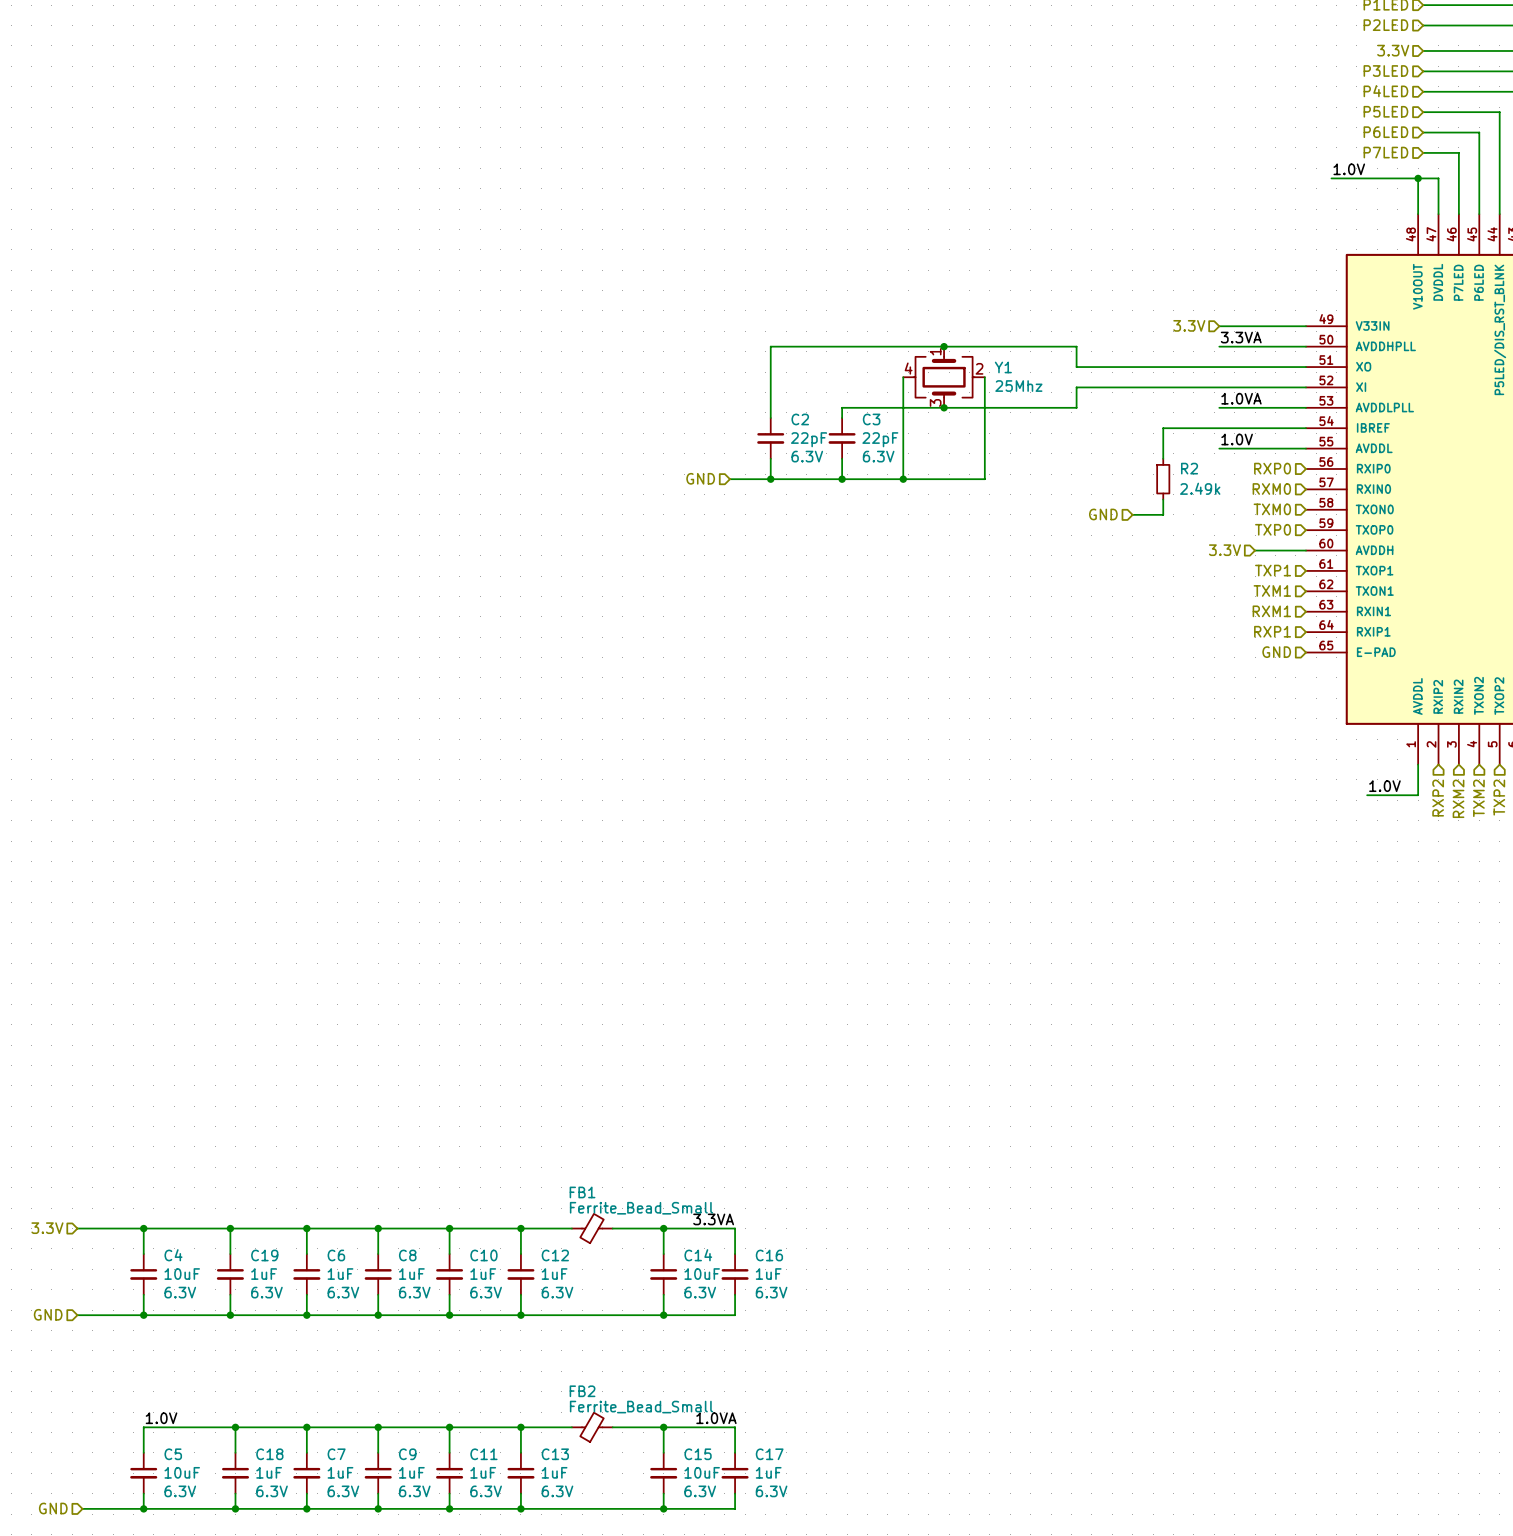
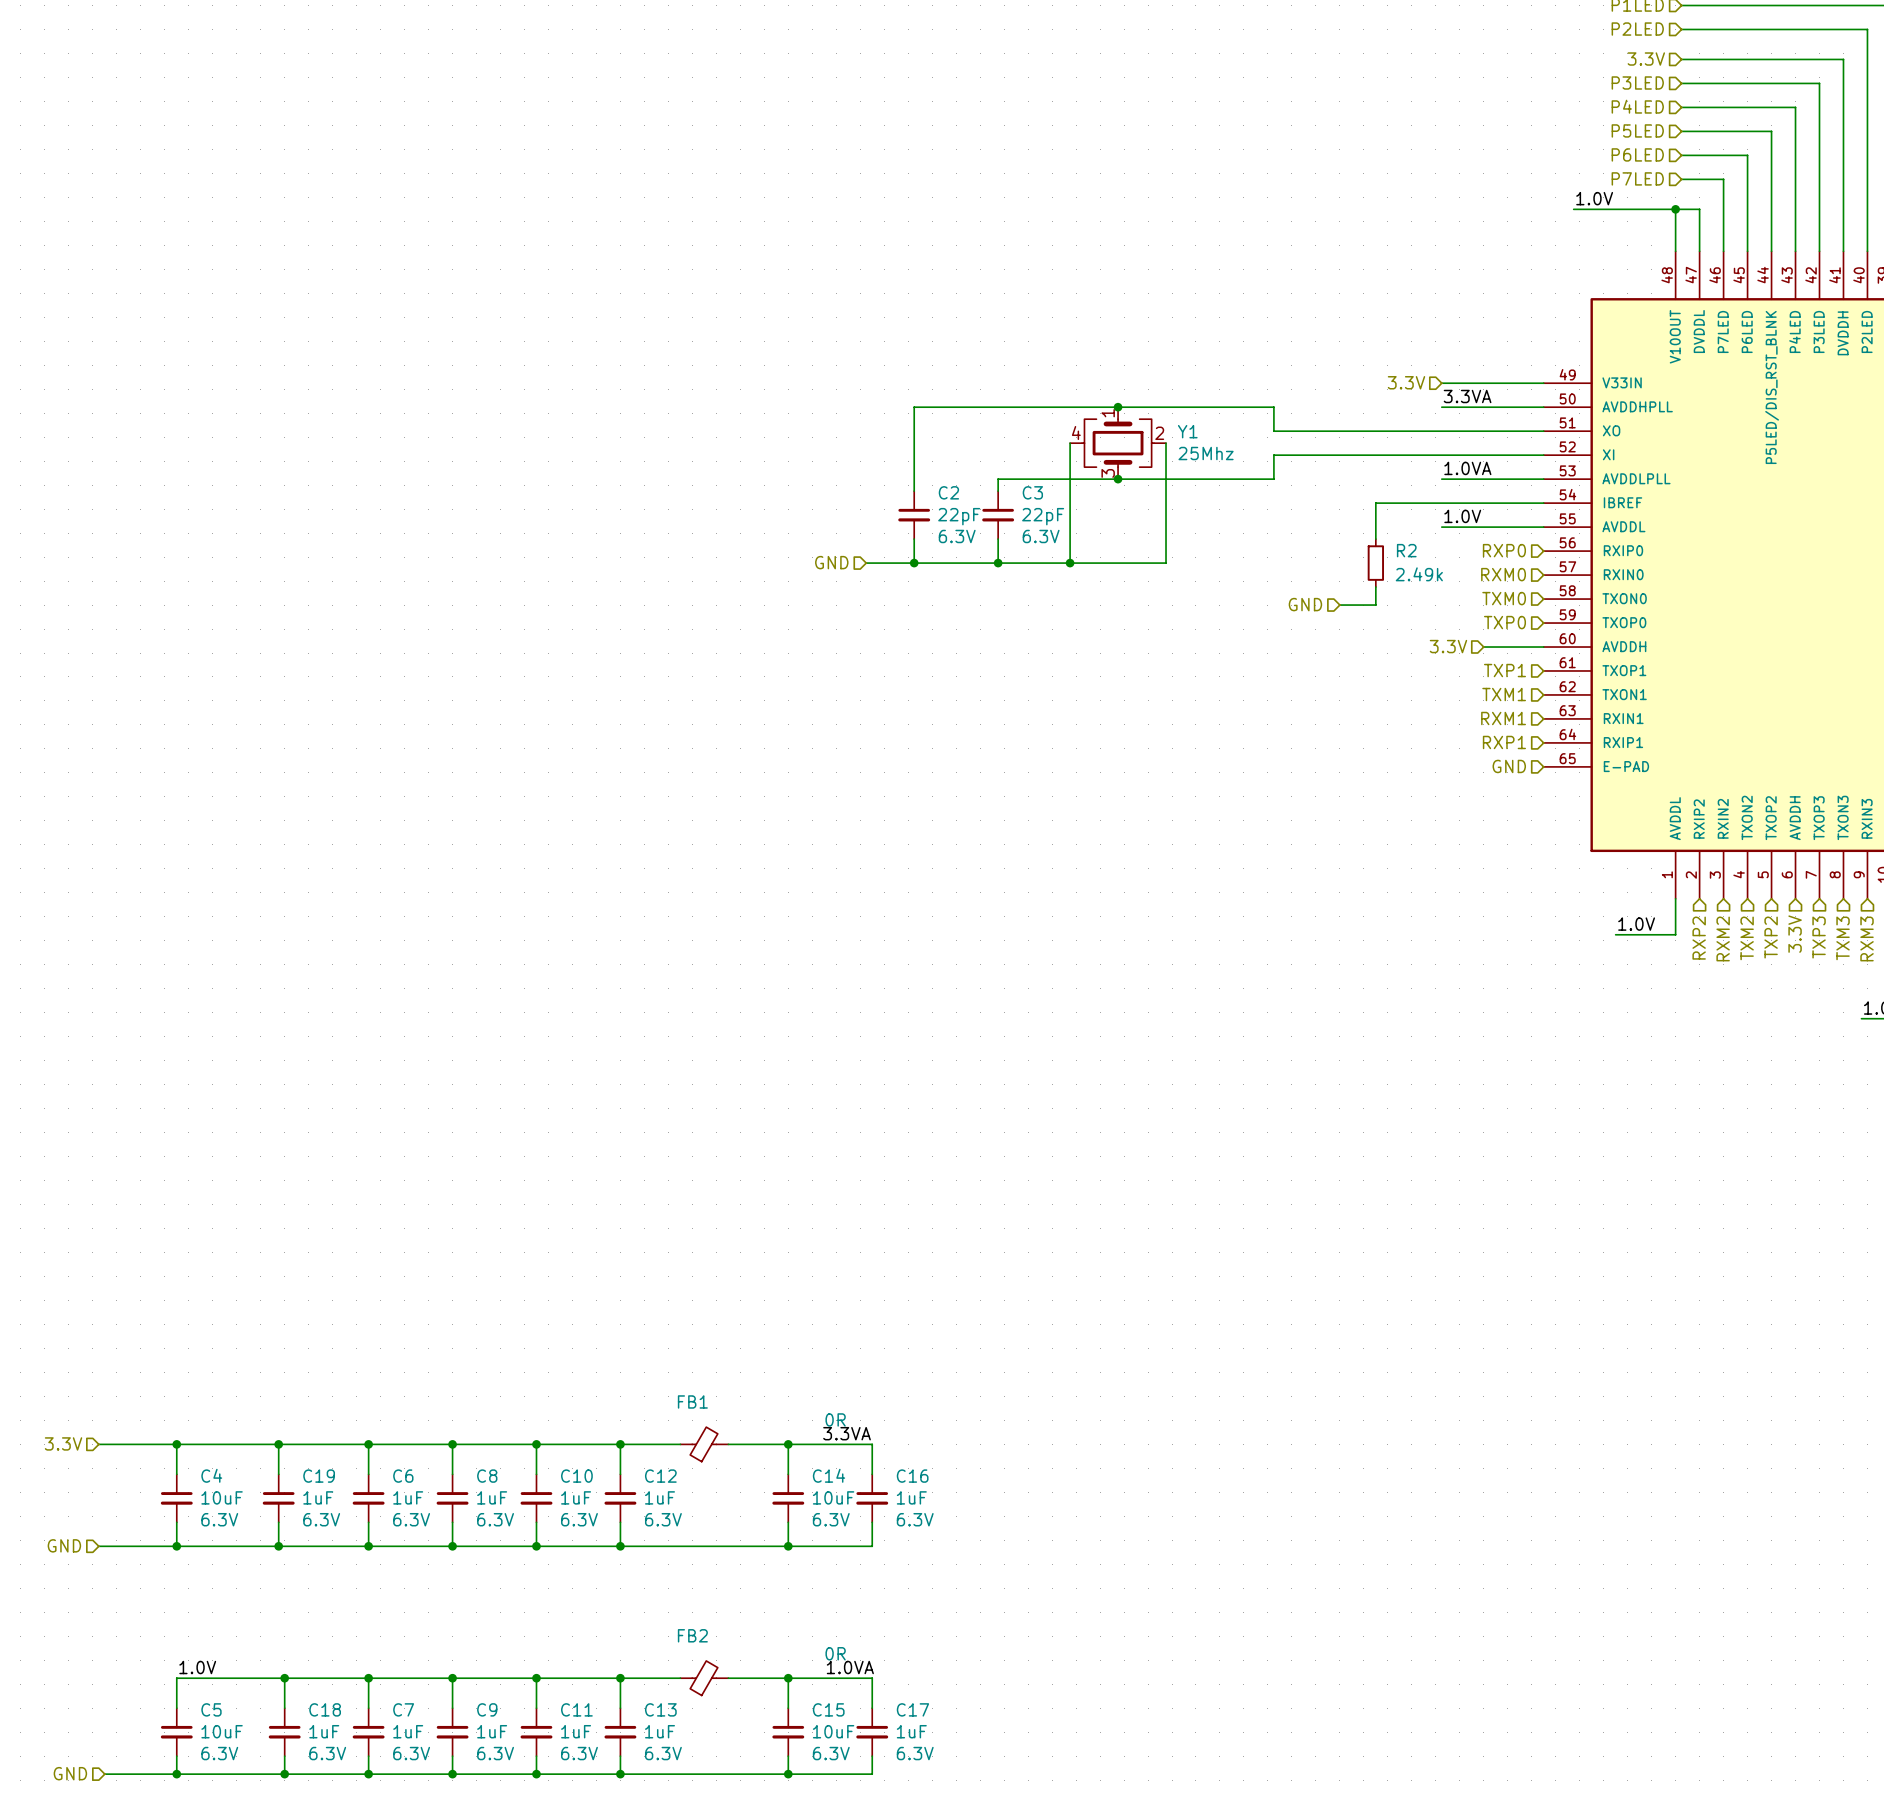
FB1 value: Ferrite_Bead_Small (641, 1208) -> 0R (835, 1419)
FB2 value: Ferrite_Bead_Small (641, 1407) -> 0R (835, 1653)

